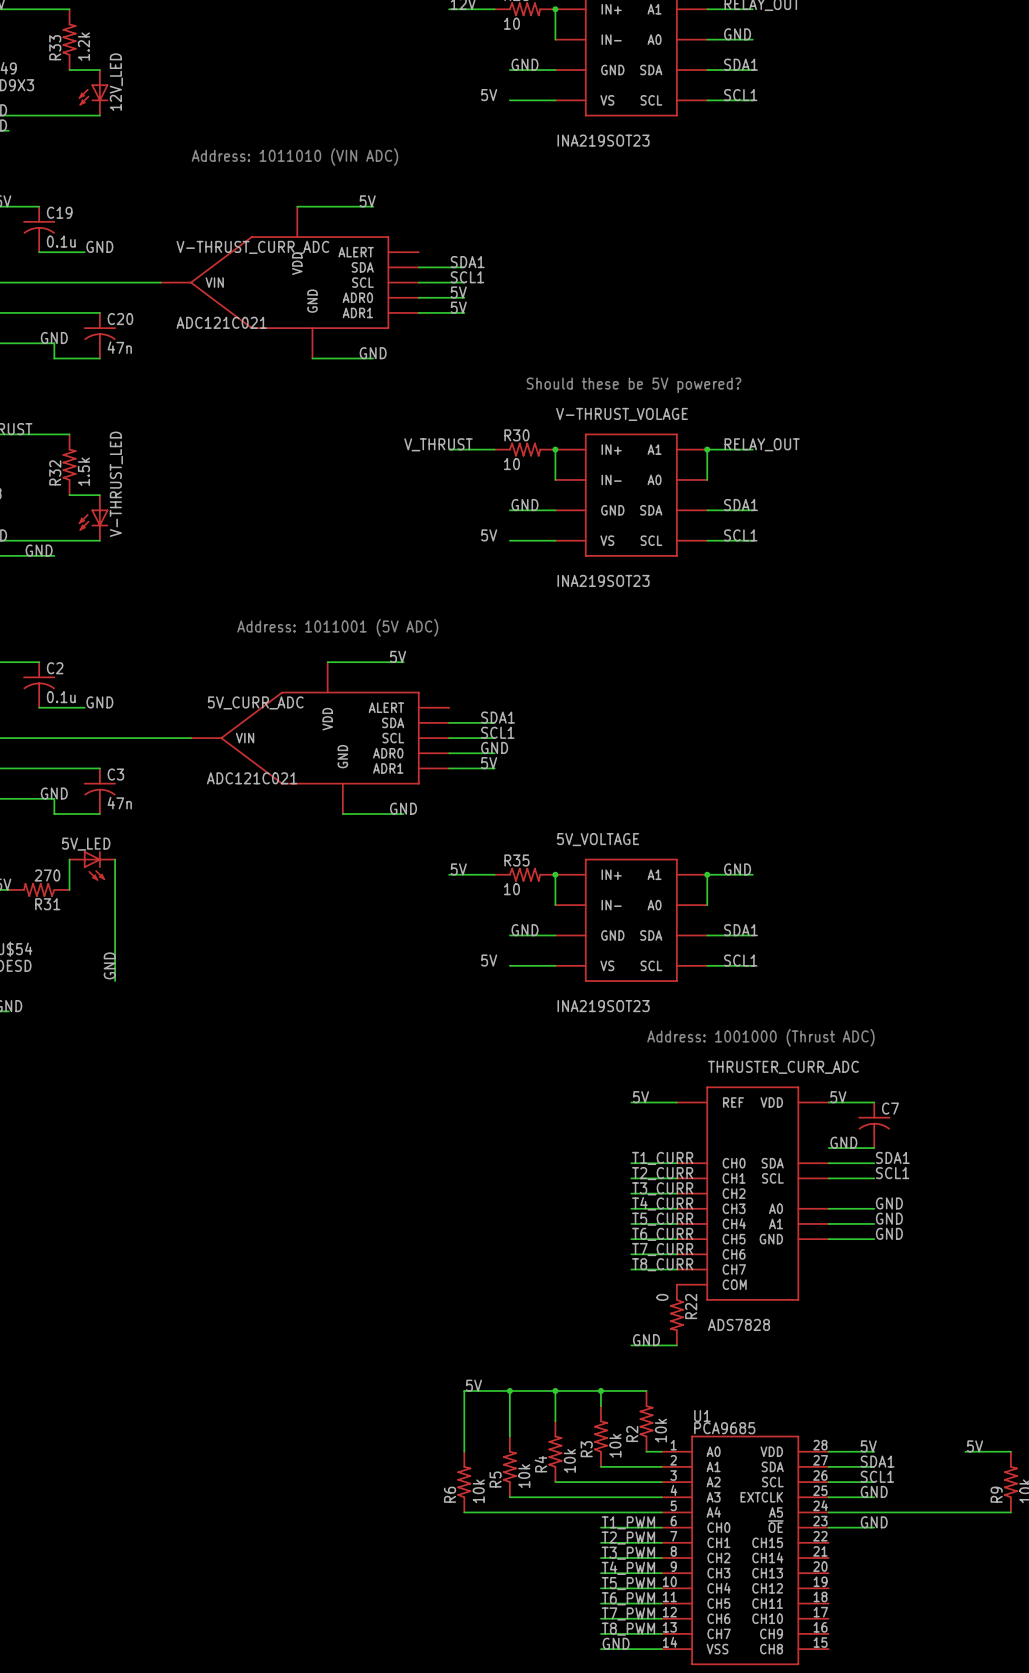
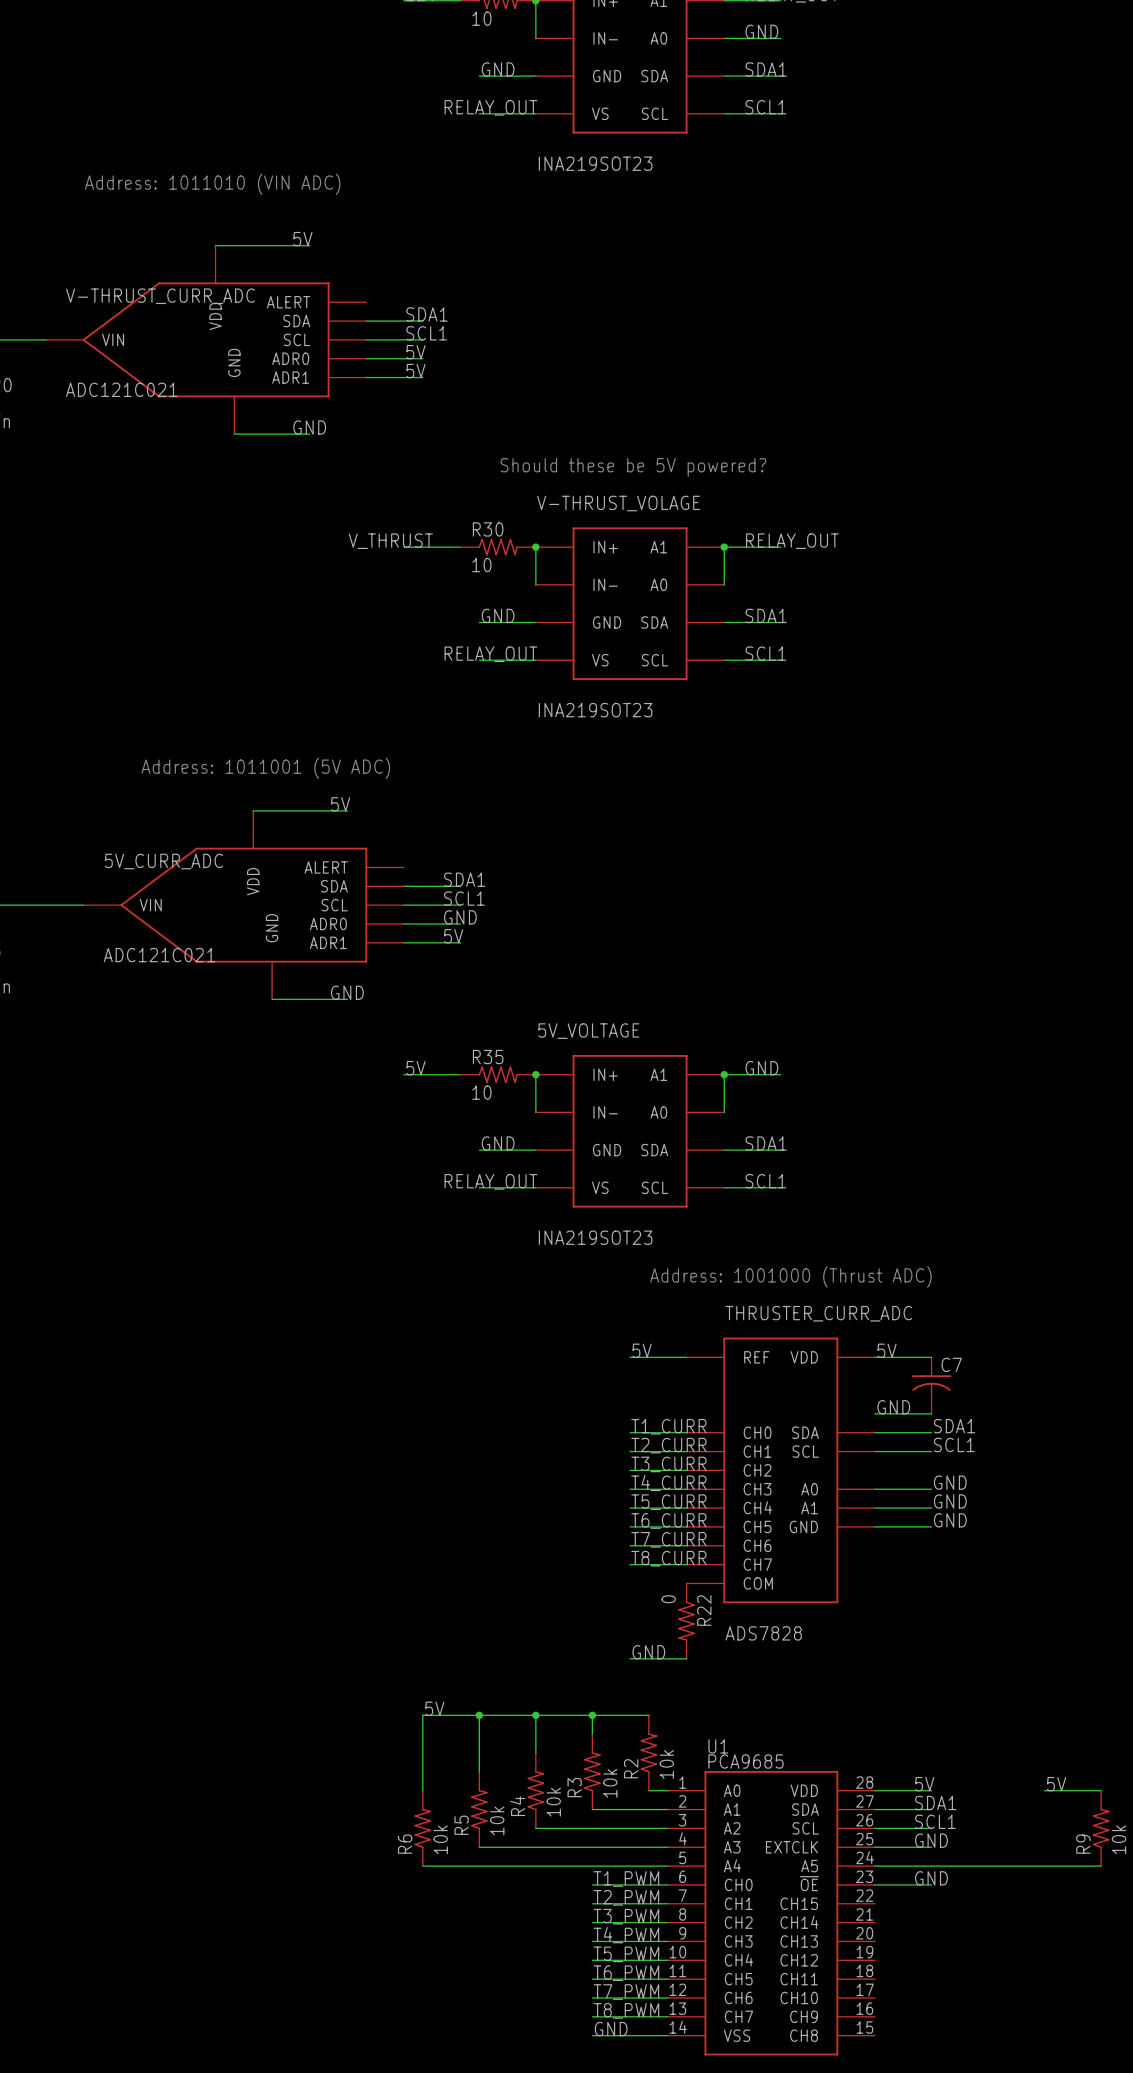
label: 5V (489, 95) -> RELAY_OUT (490, 107)
label: 5V (489, 535) -> RELAY_OUT (490, 654)
label: 5V (489, 960) -> RELAY_OUT (490, 1181)

